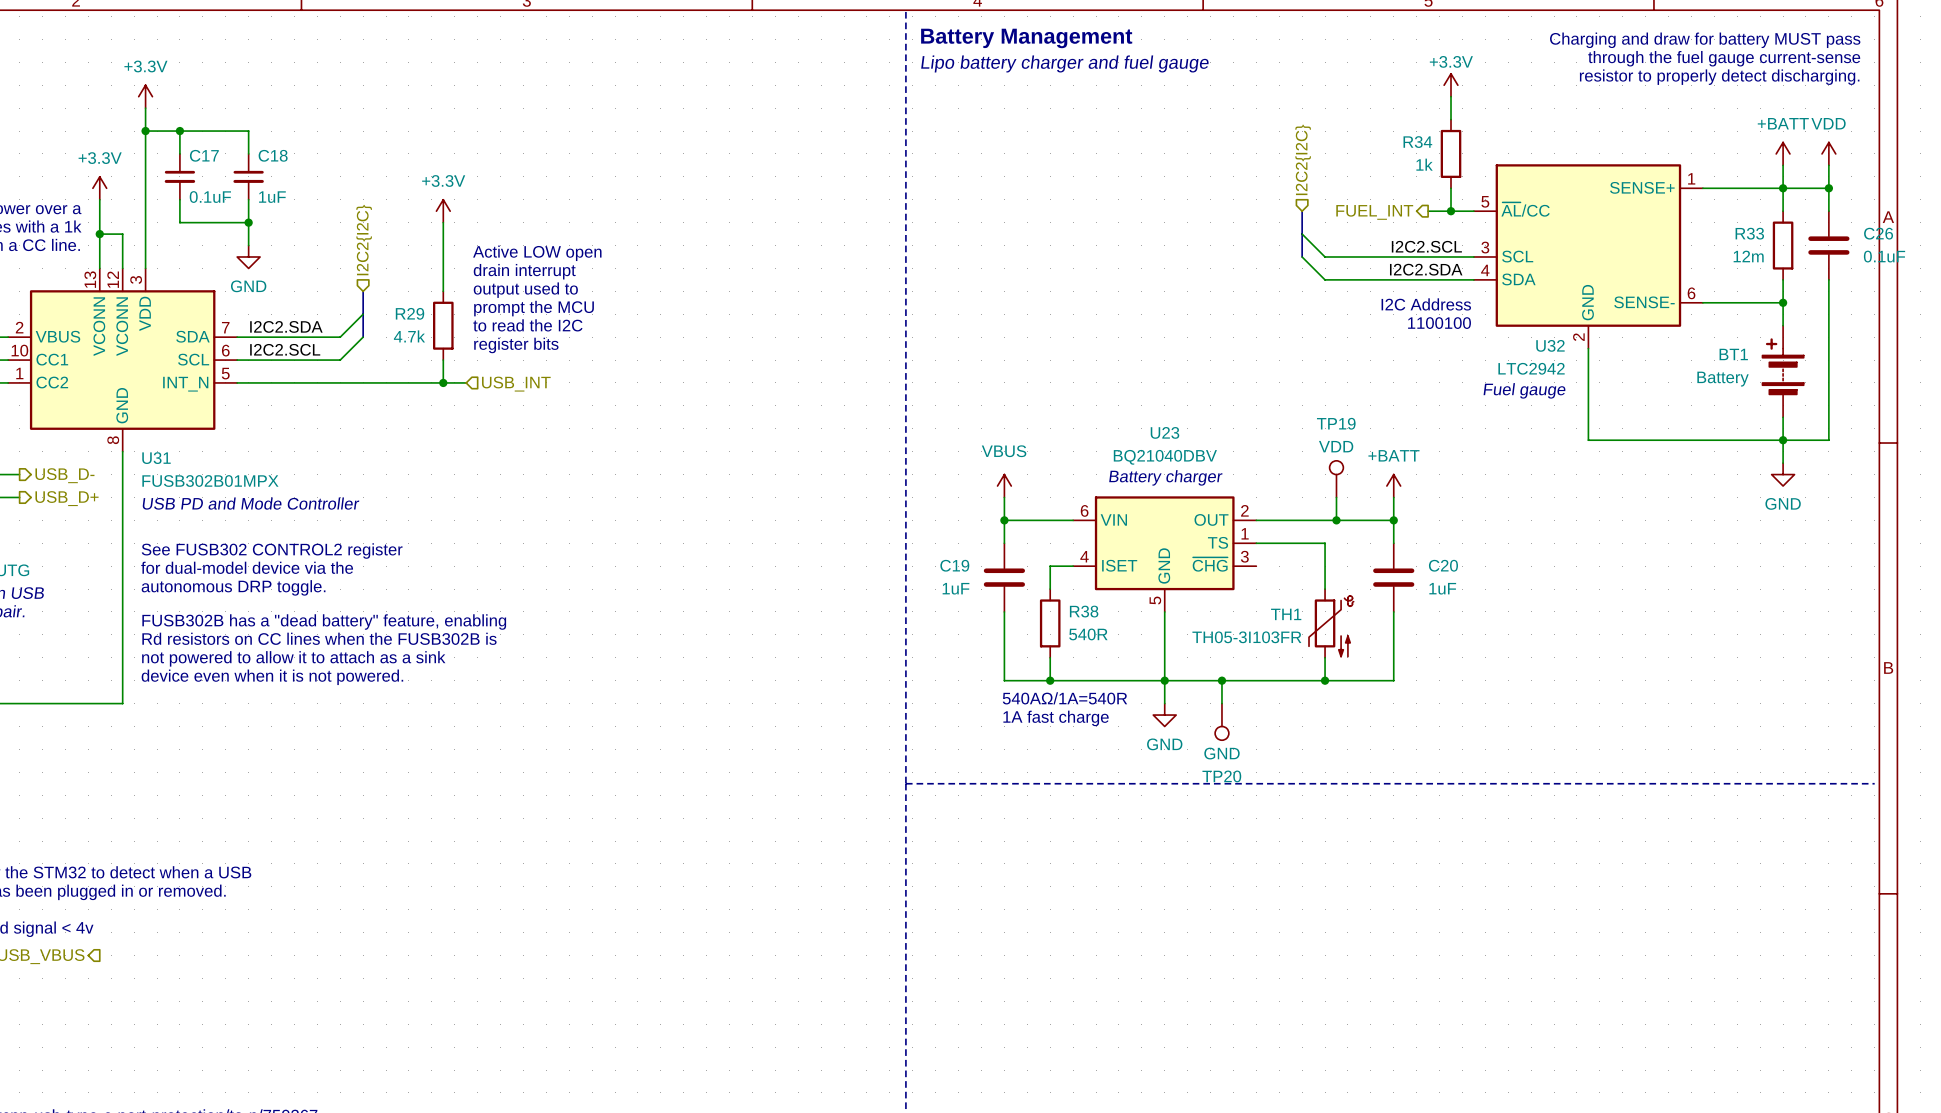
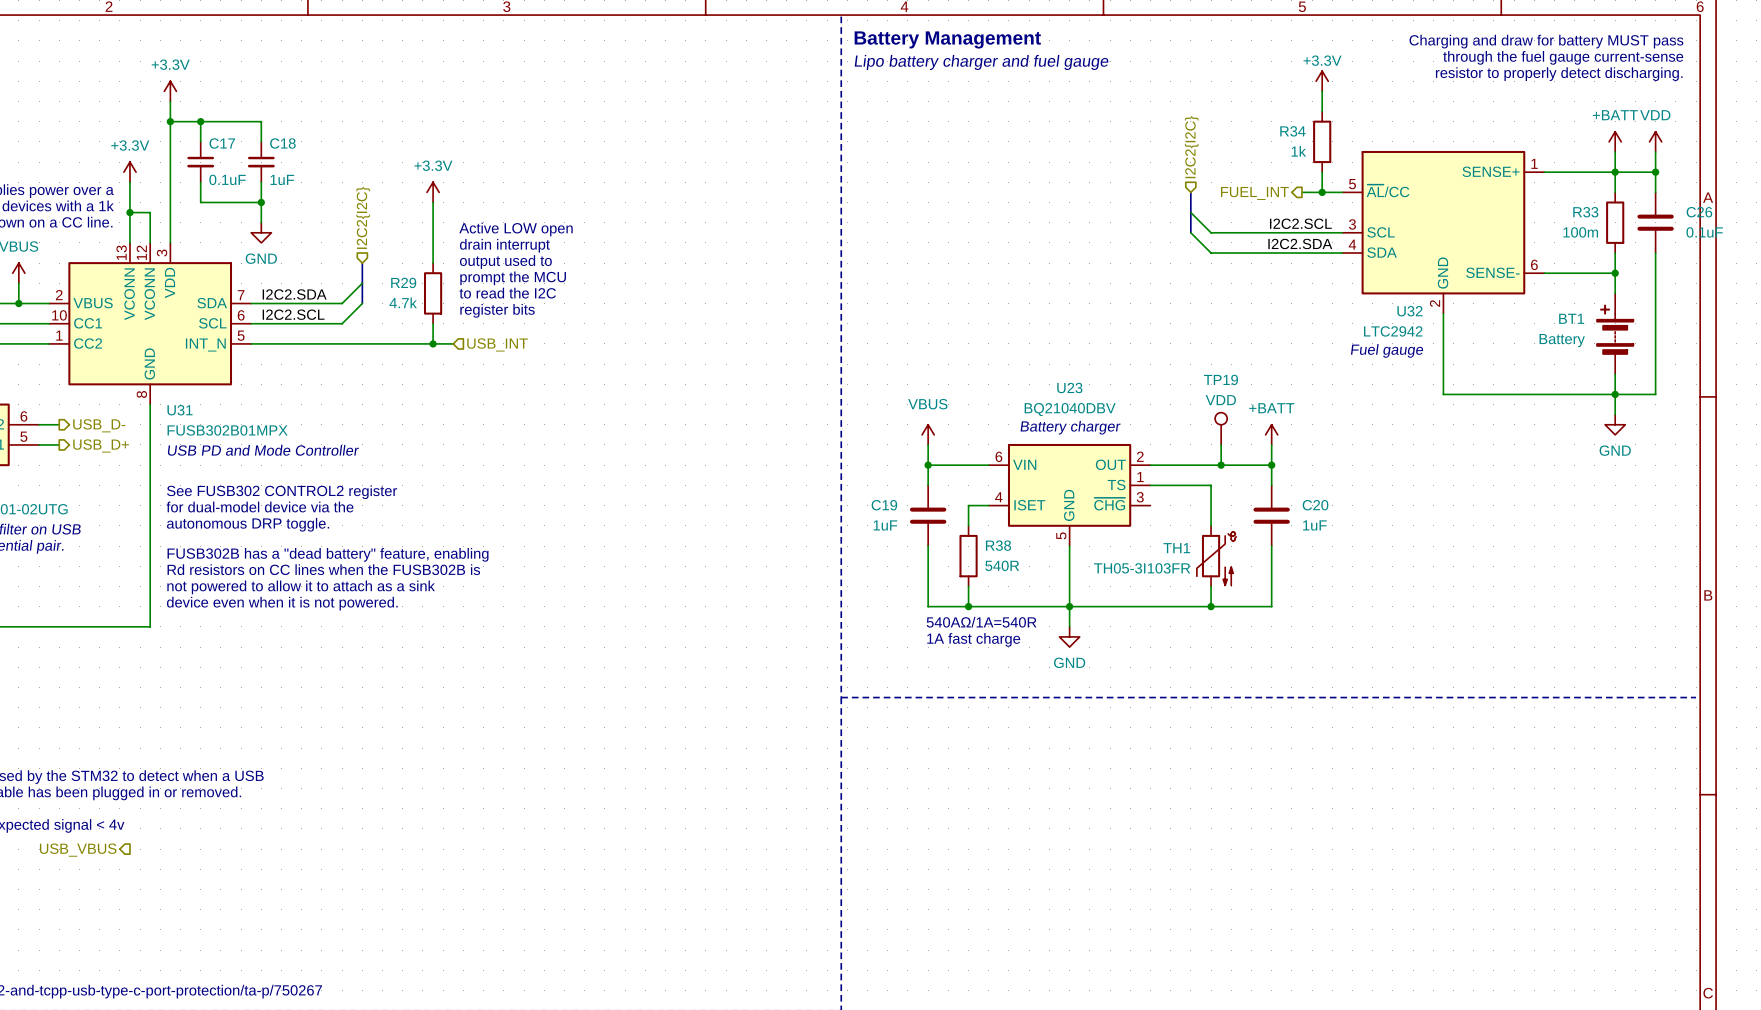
R33 value: 12m (1748, 256) -> 100m (1580, 232)
text: I2C Address (1426, 304) -> none
text: 1100100 (1439, 323) -> none
wire: (1221, 680) (1221, 703) -> none
junction: (1221, 680) -> none
TP20: GND (1221, 721) -> none

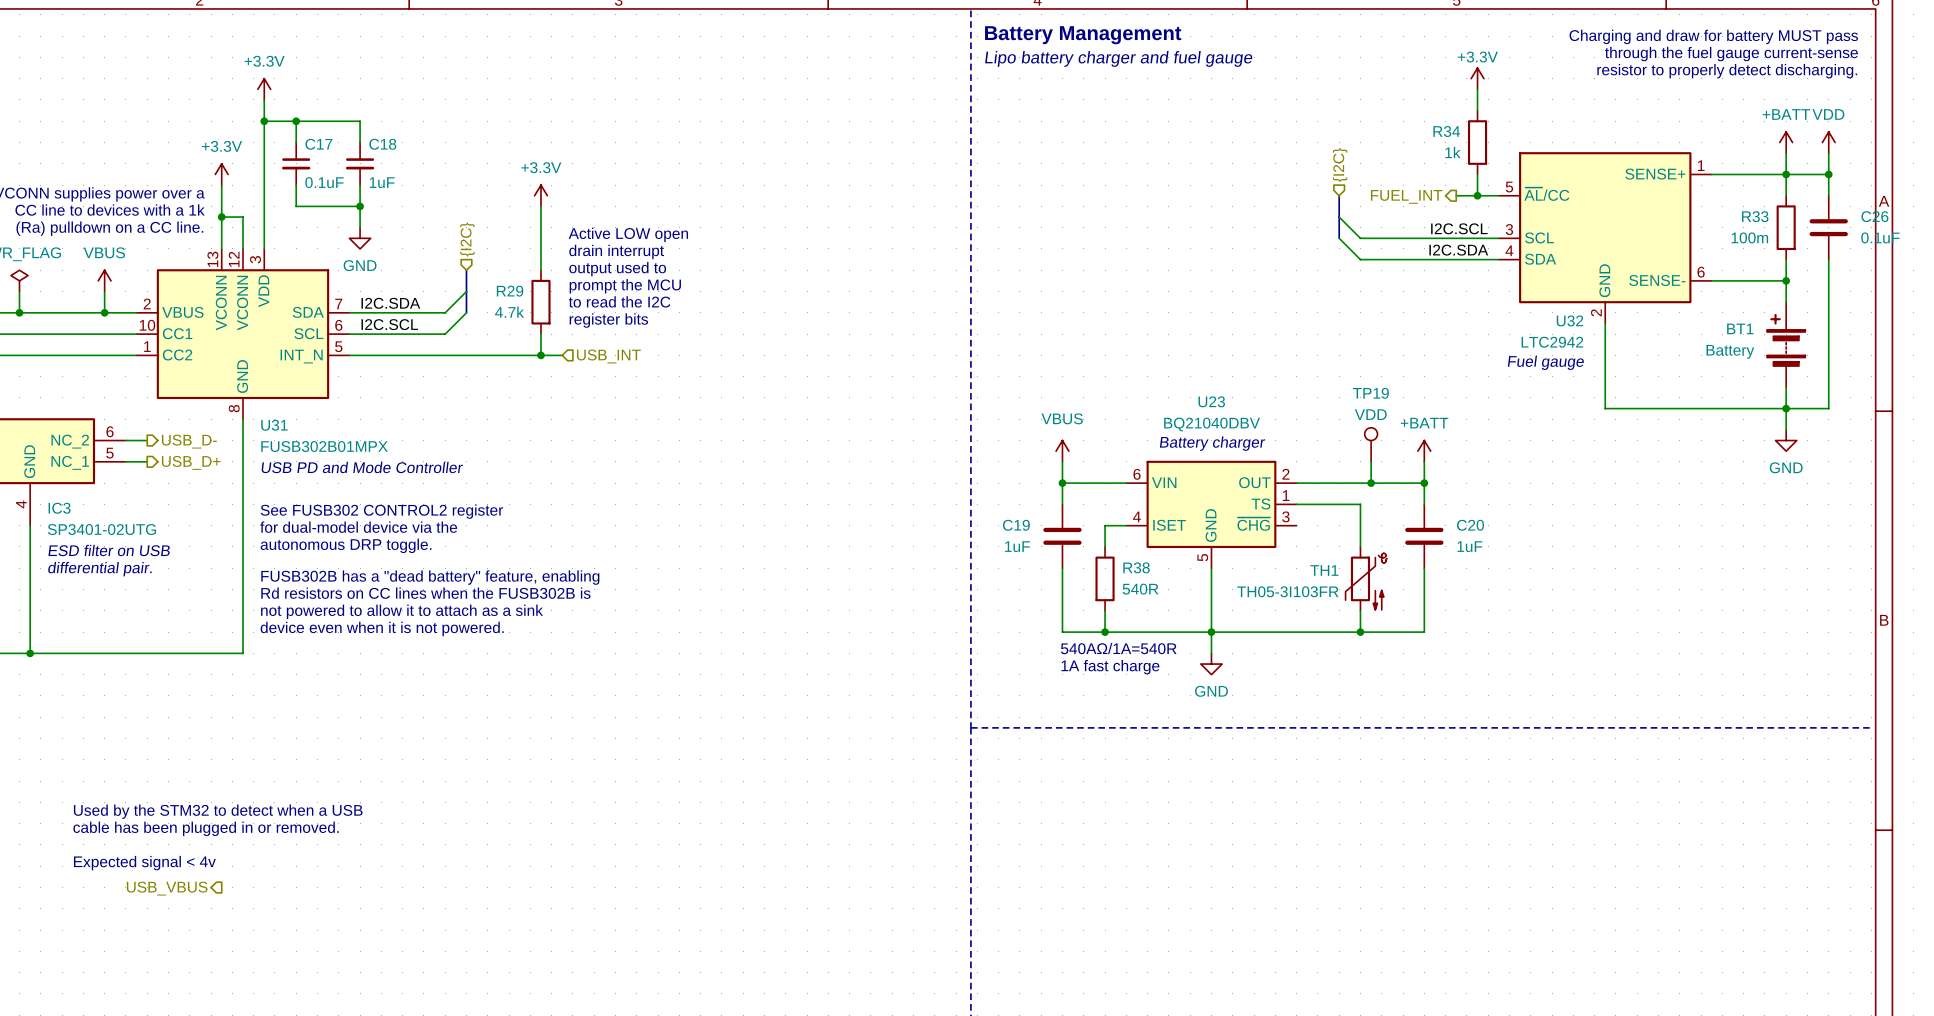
hierarchical label: I2C2{I2C} (1191, 147) -> {I2C} (1340, 165)
hierarchical label: I2C2{I2C} (363, 217) -> {I2C} (467, 239)
label: I2C2.SCL (1300, 223) -> I2C.SCL (1459, 228)
label: I2C2.SDA (1300, 243) -> I2C.SDA (1458, 250)
label: I2C2.SDA (294, 294) -> I2C.SDA (390, 303)
label: I2C2.SCL (293, 314) -> I2C.SCL (389, 324)

